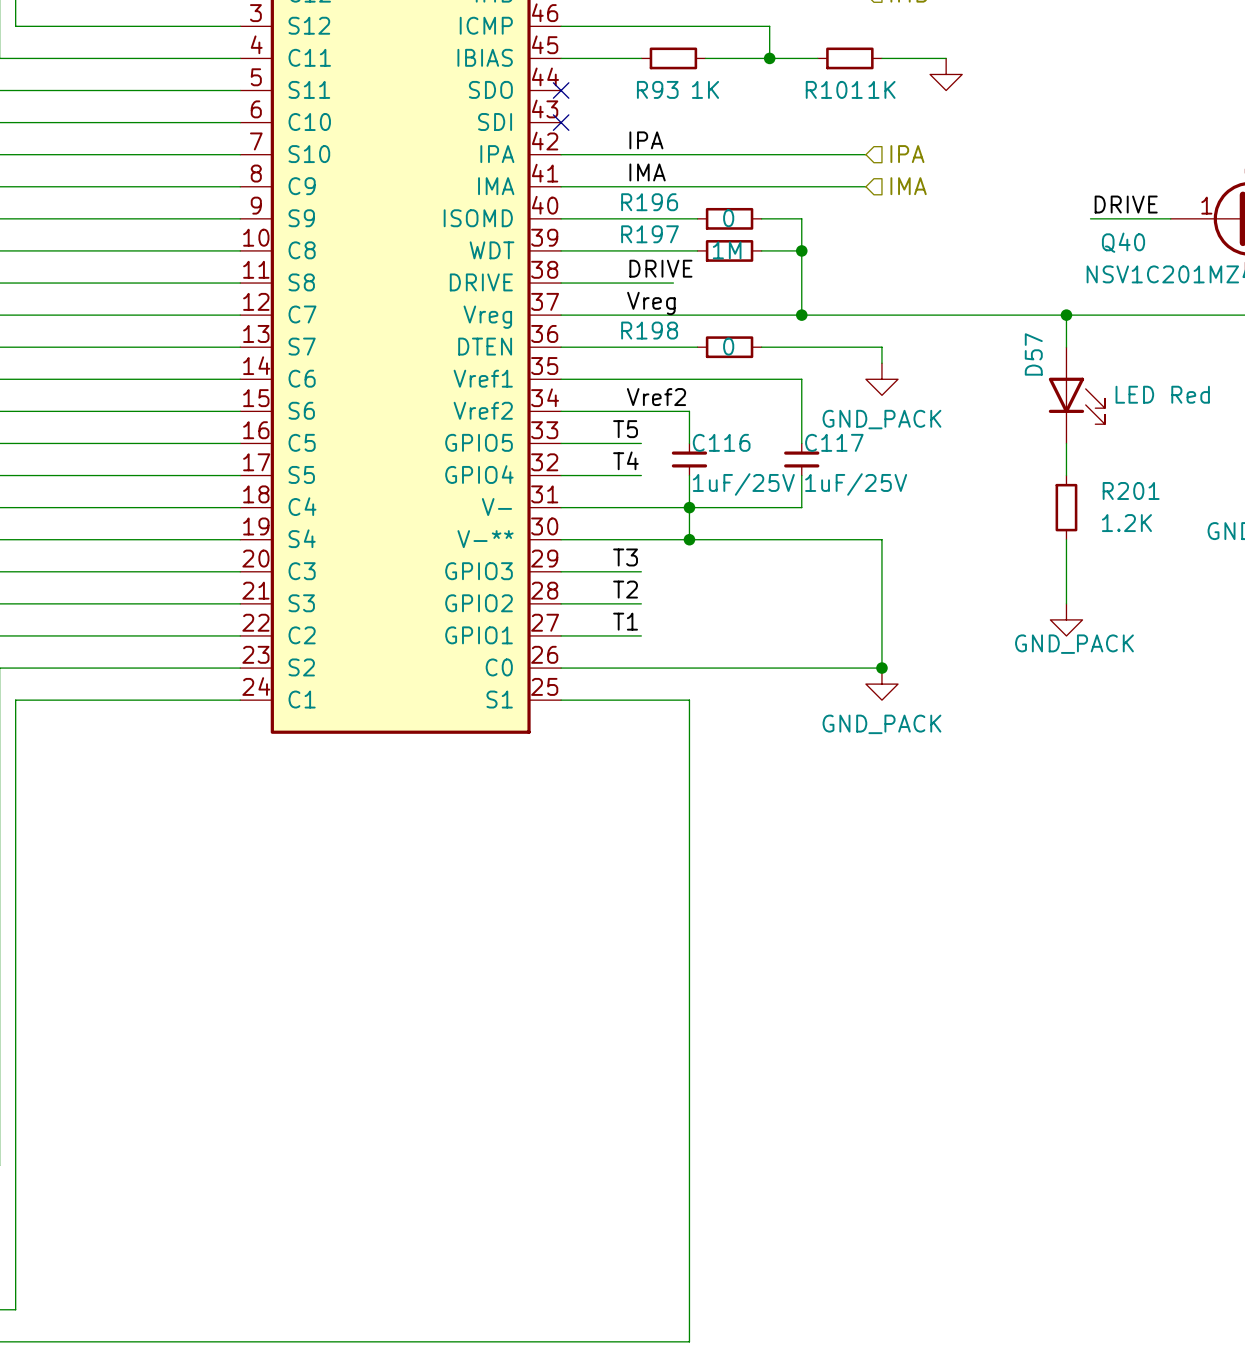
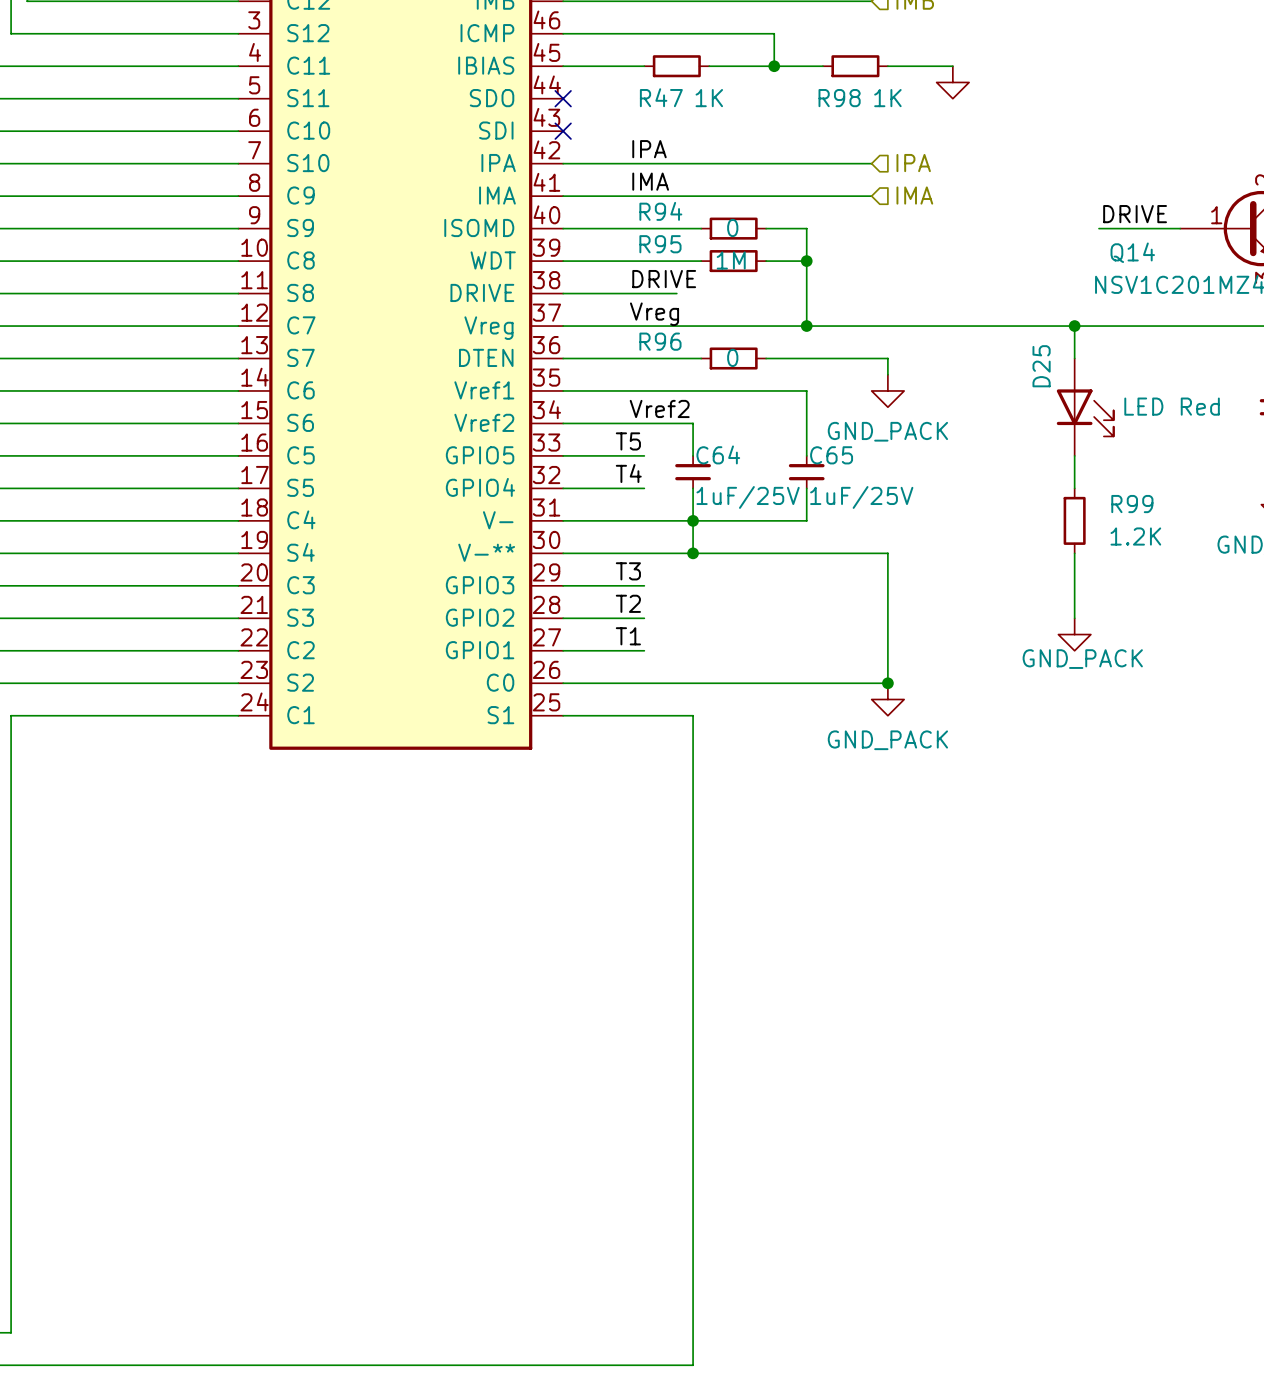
R93 name: R93 (657, 89) -> R47 (661, 97)
R101 name: R101 (834, 89) -> R98 (839, 98)
R196 name: R196 (649, 202) -> R94 (660, 211)
R197 name: R197 (649, 234) -> R95 (660, 244)
Q40 name: Q40 (1123, 242) -> Q14 (1132, 252)
R198 name: R198 (649, 330) -> R96 (660, 341)
D57 name: D57 (1033, 354) -> D25 (1041, 366)
C116 name: C116 (721, 442) -> C64 (718, 454)
C117 name: C117 (834, 442) -> C65 (831, 455)
R201 name: R201 (1131, 490) -> R99 (1132, 504)

